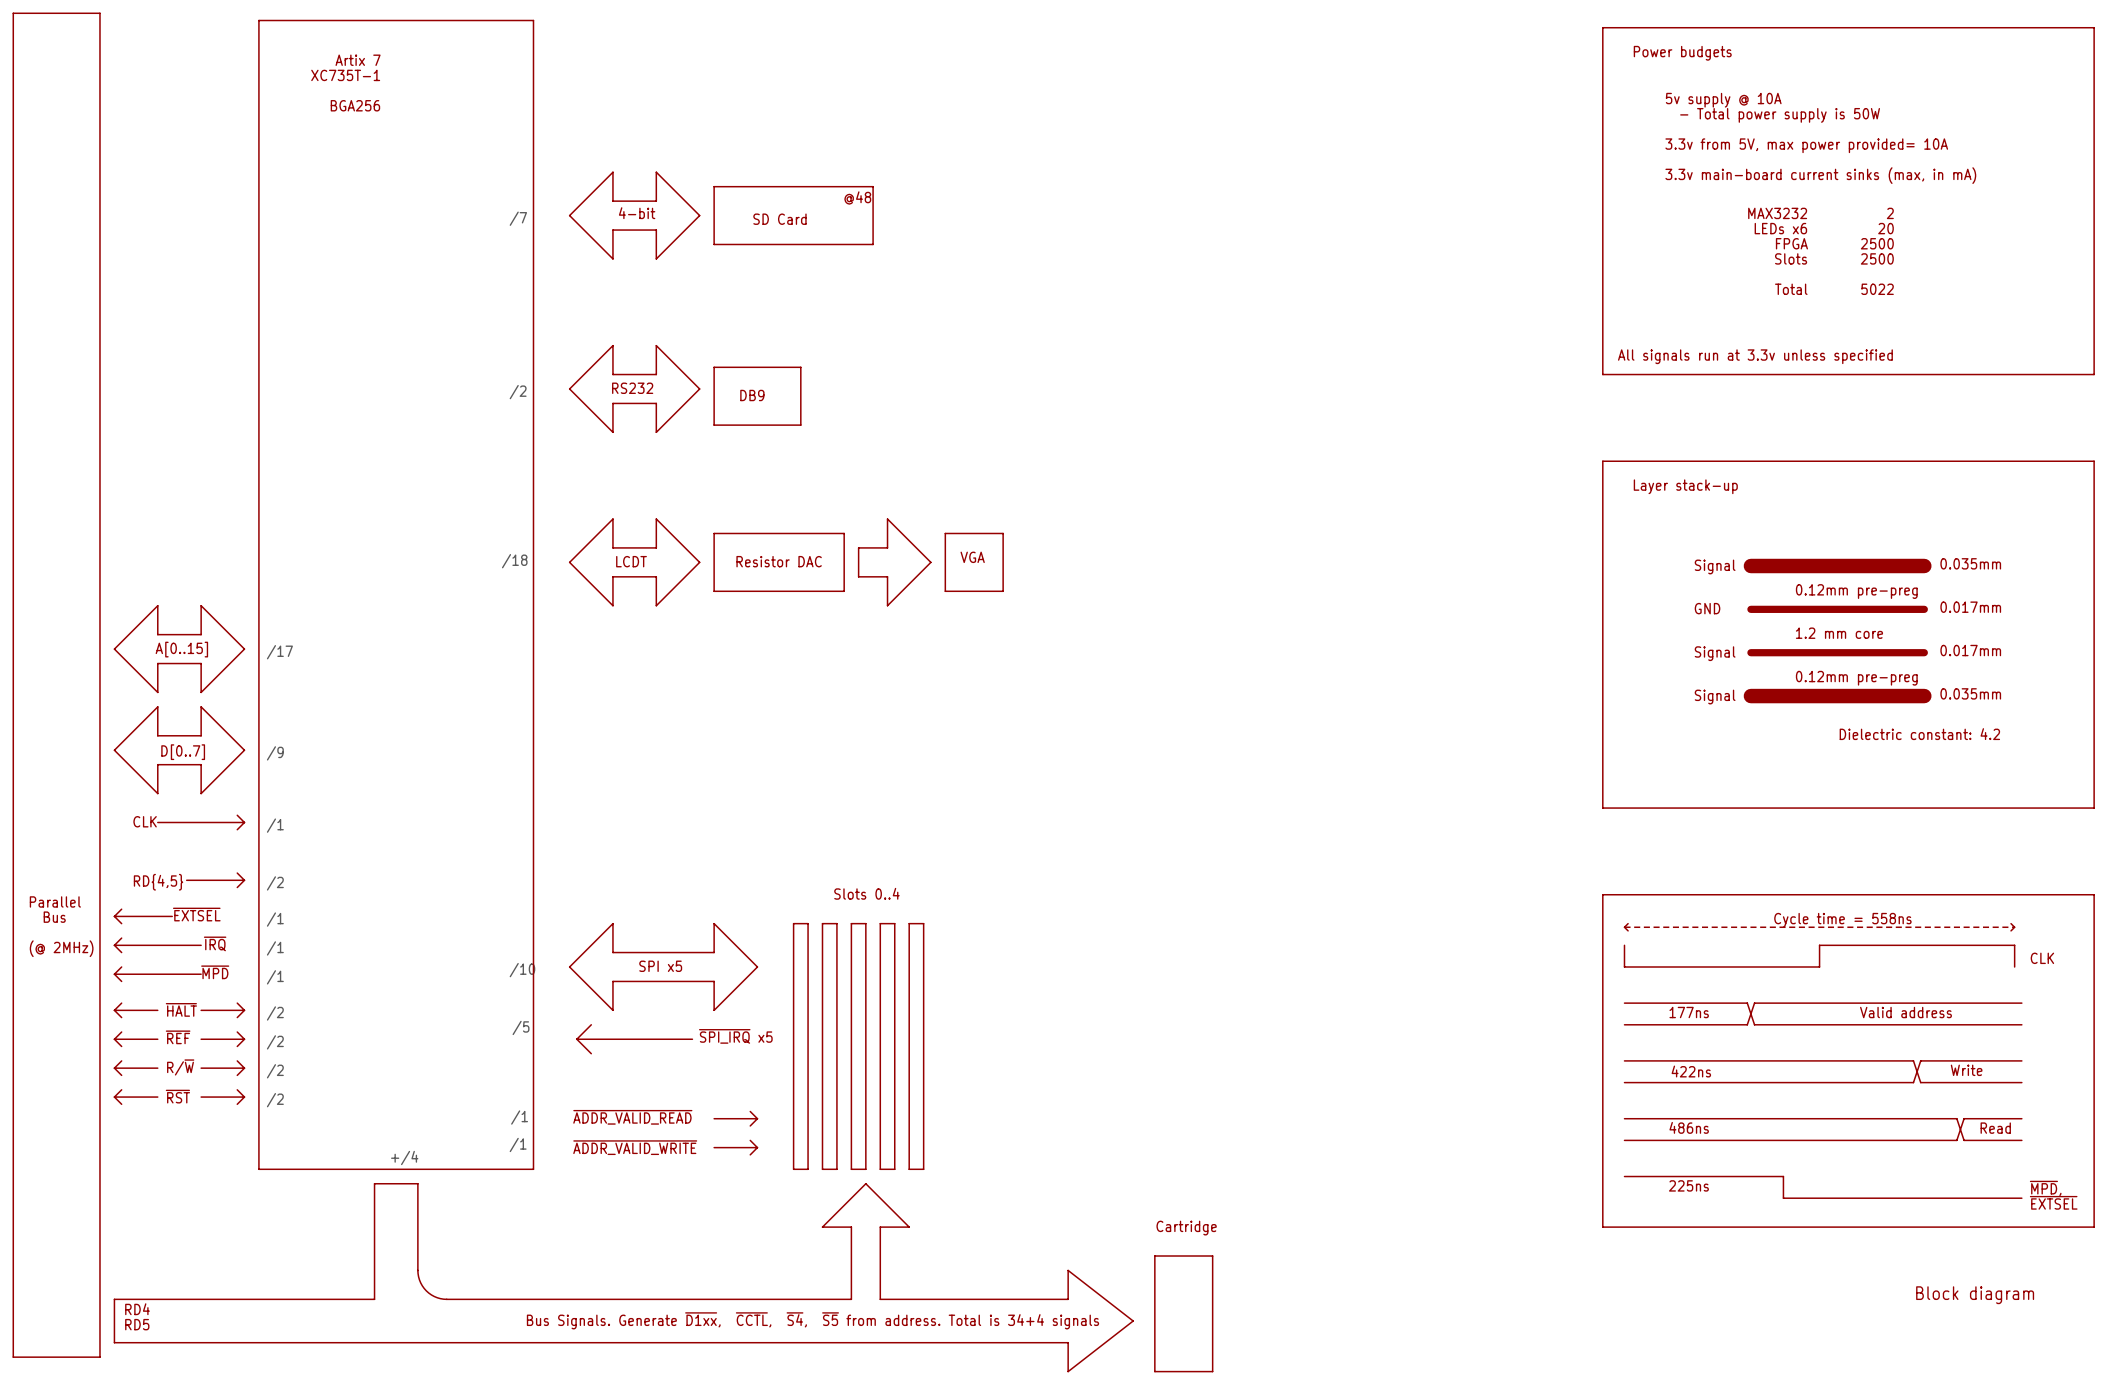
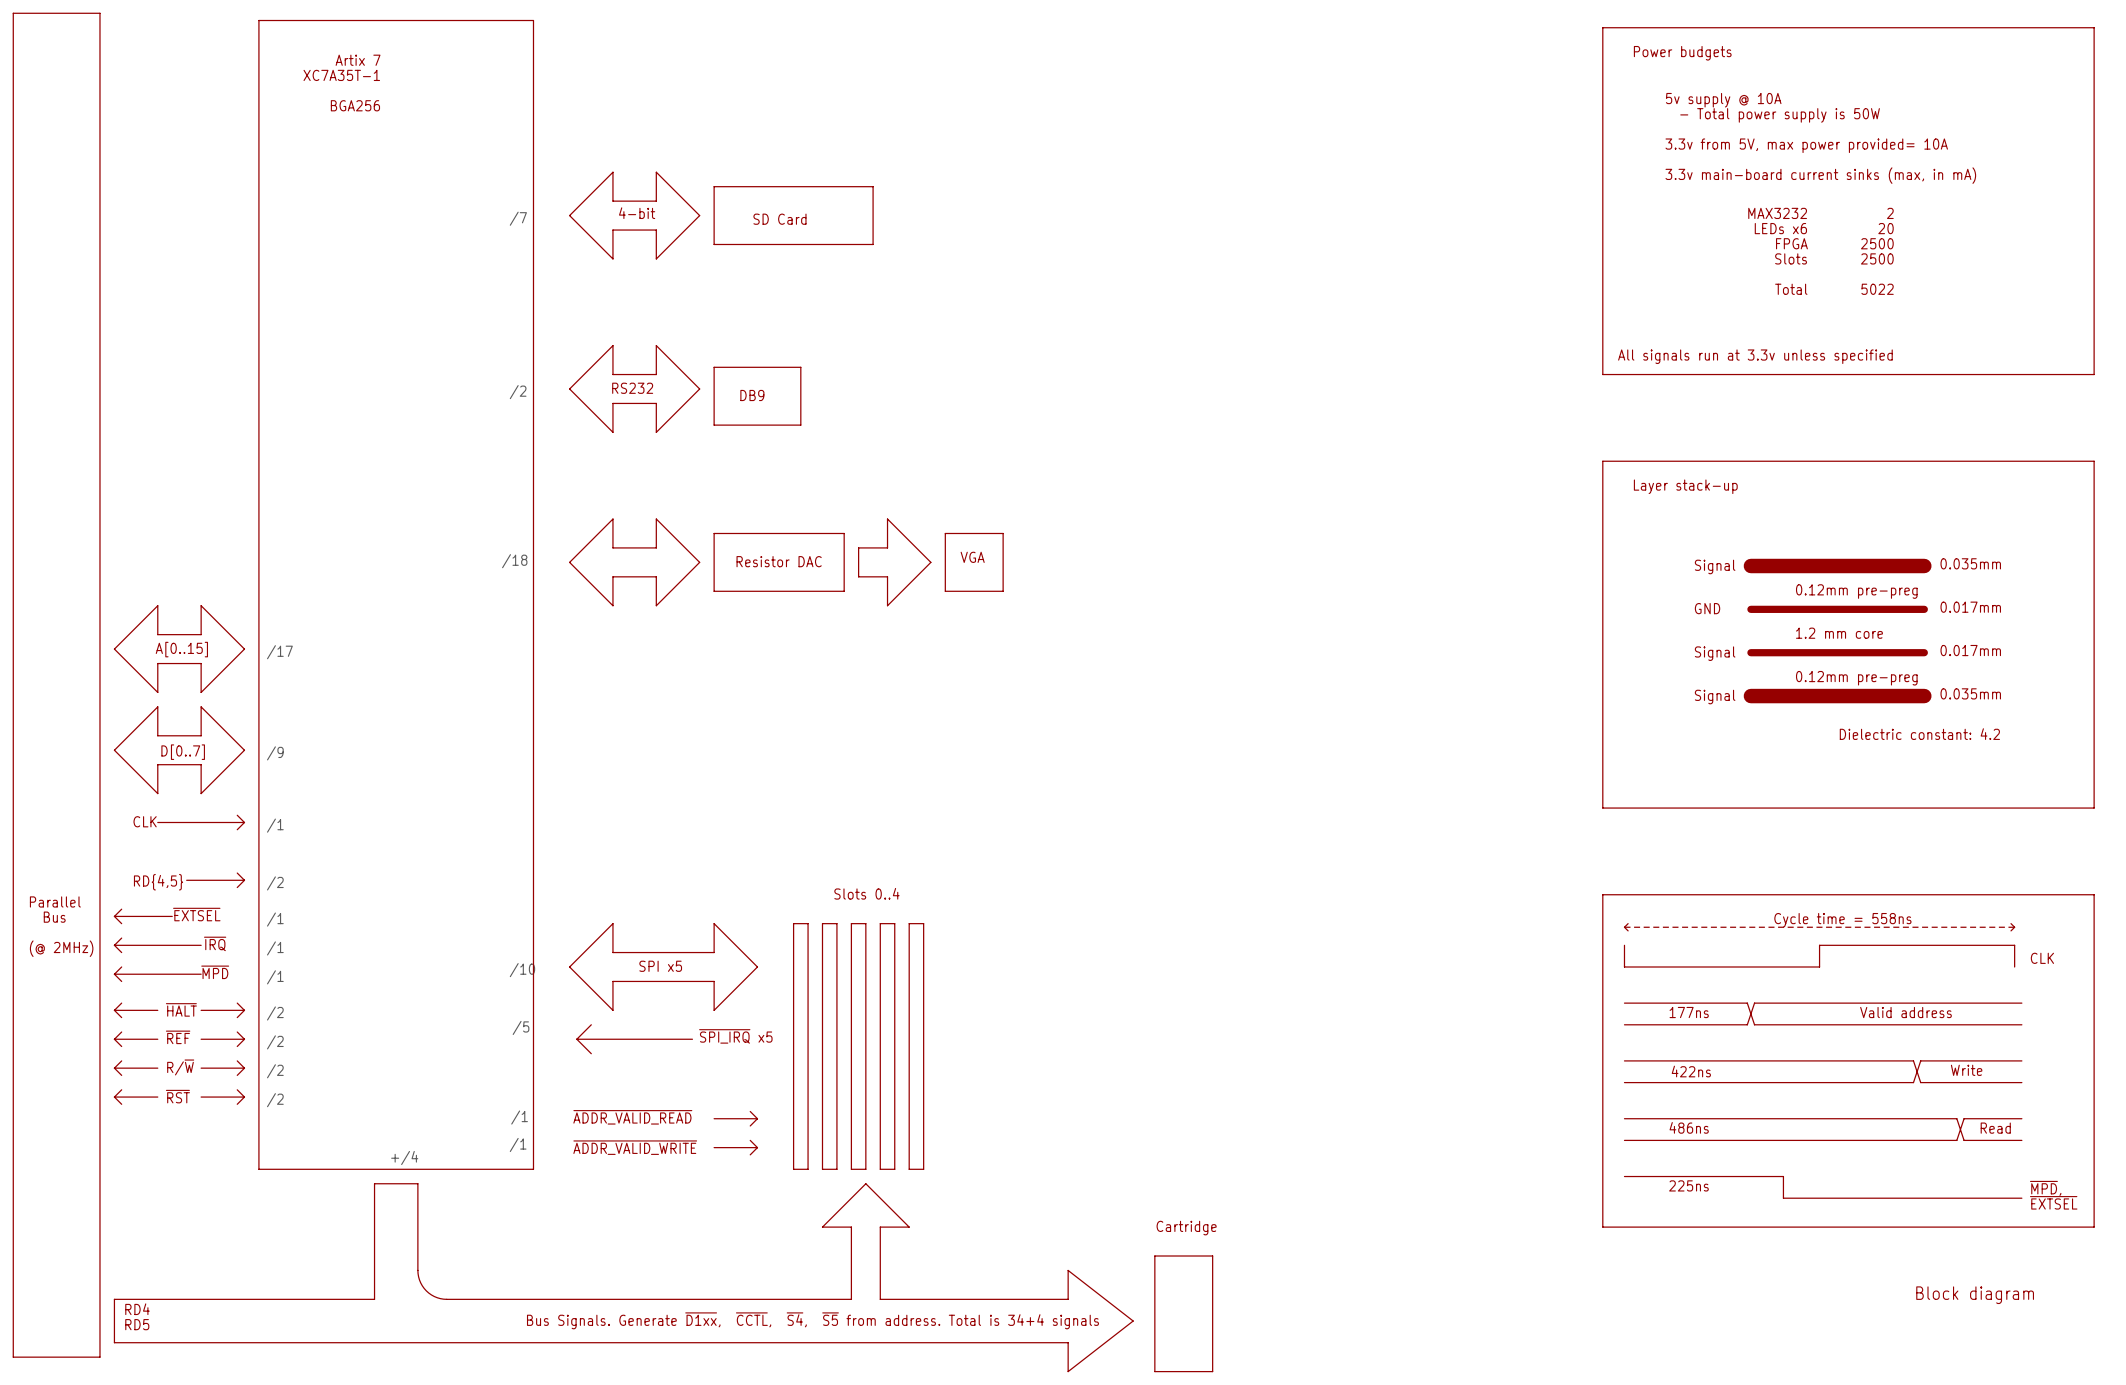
text: XC735T-1 (345, 75) -> XC7A35T-1 (341, 75)
text: @48 (857, 198) -> none
text: LCDT (631, 561) -> none

